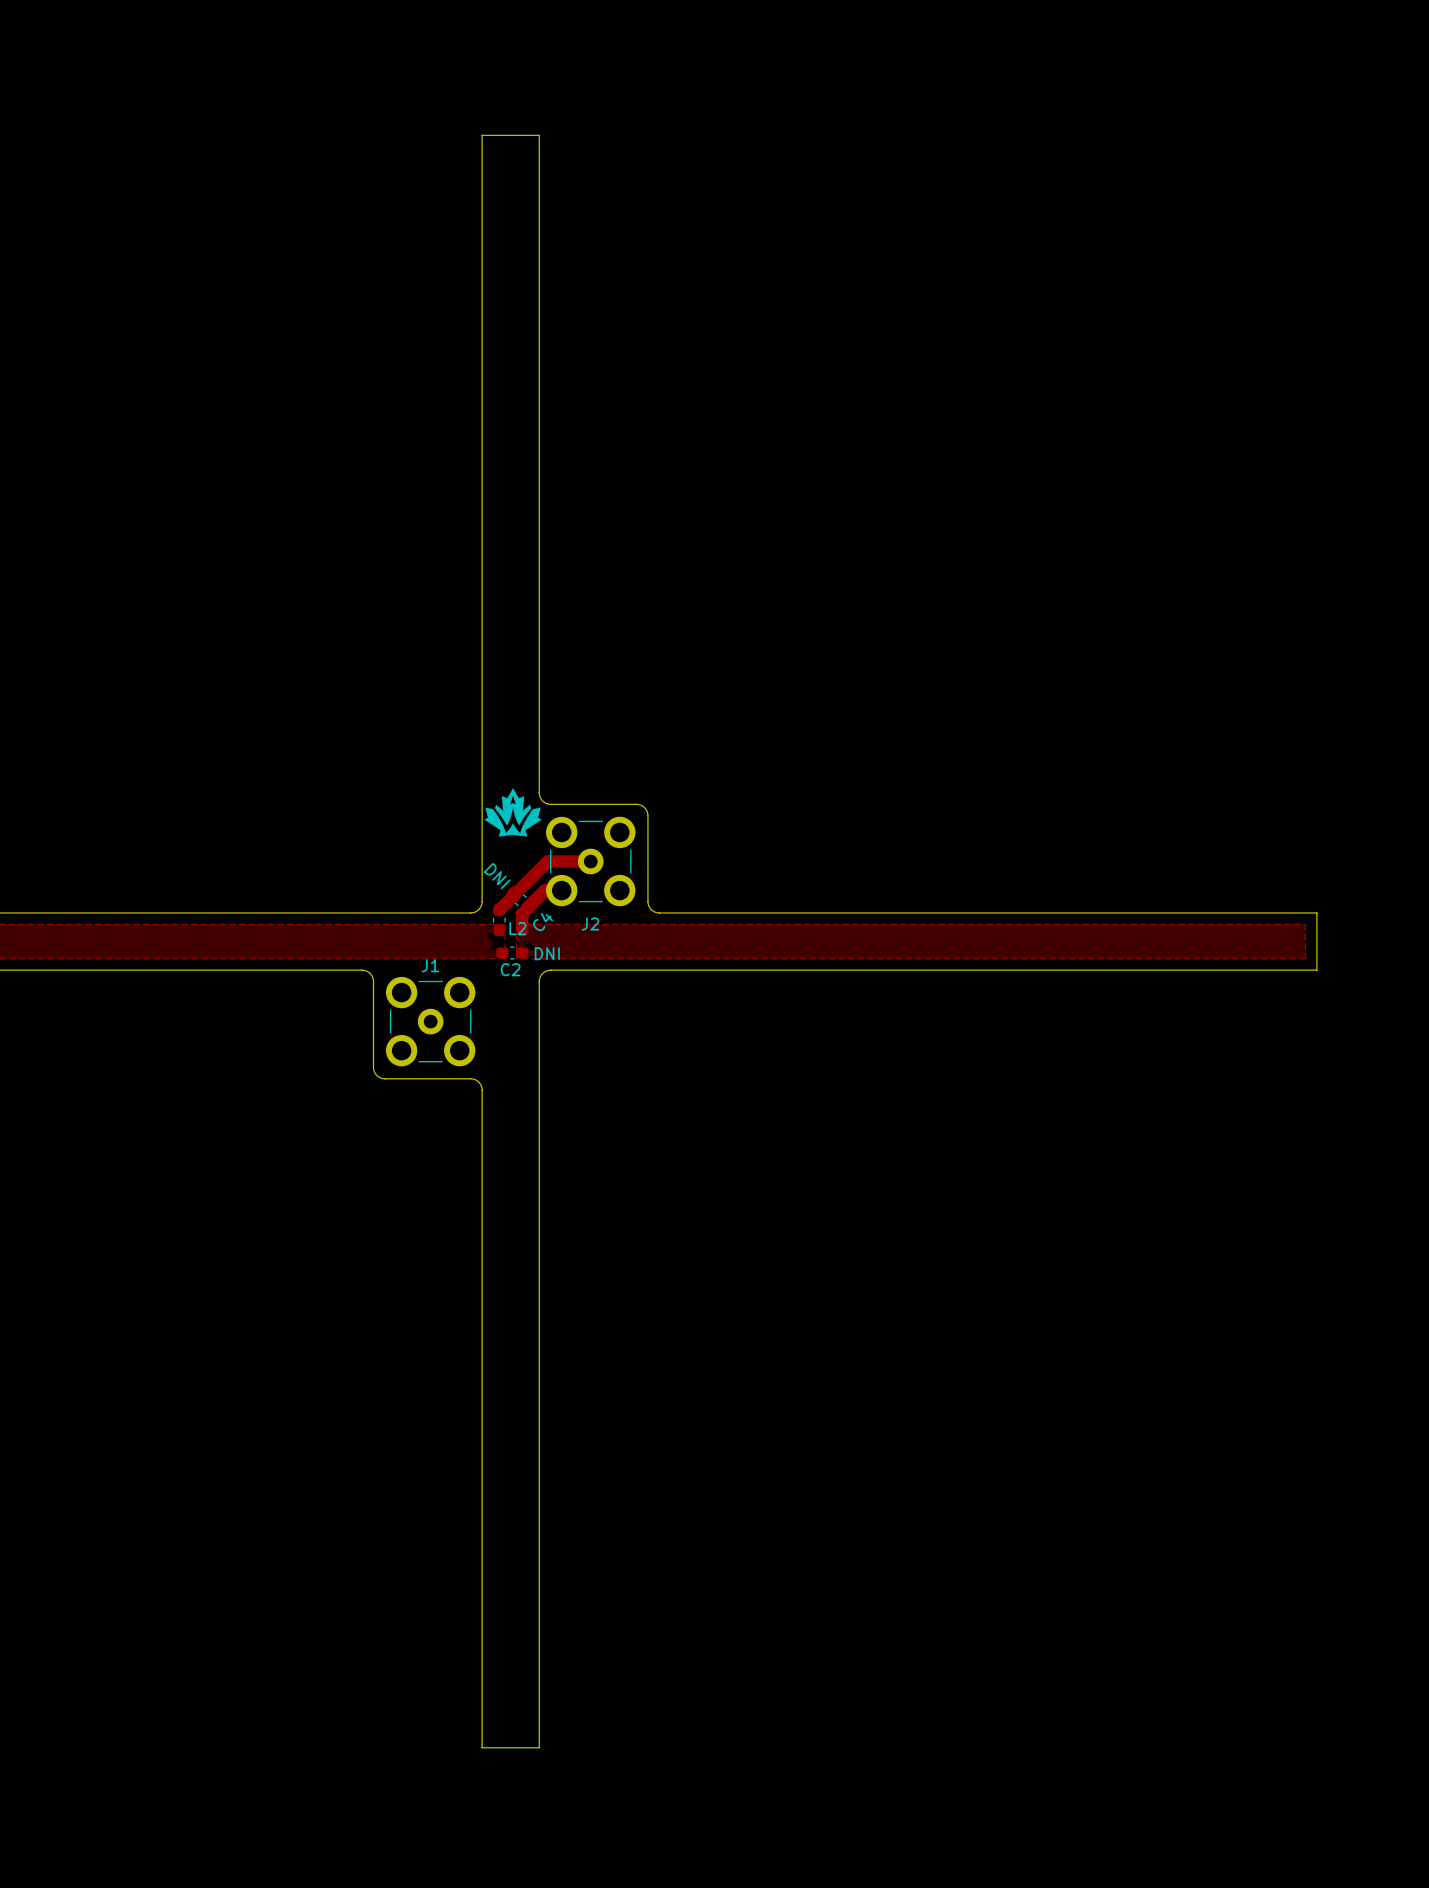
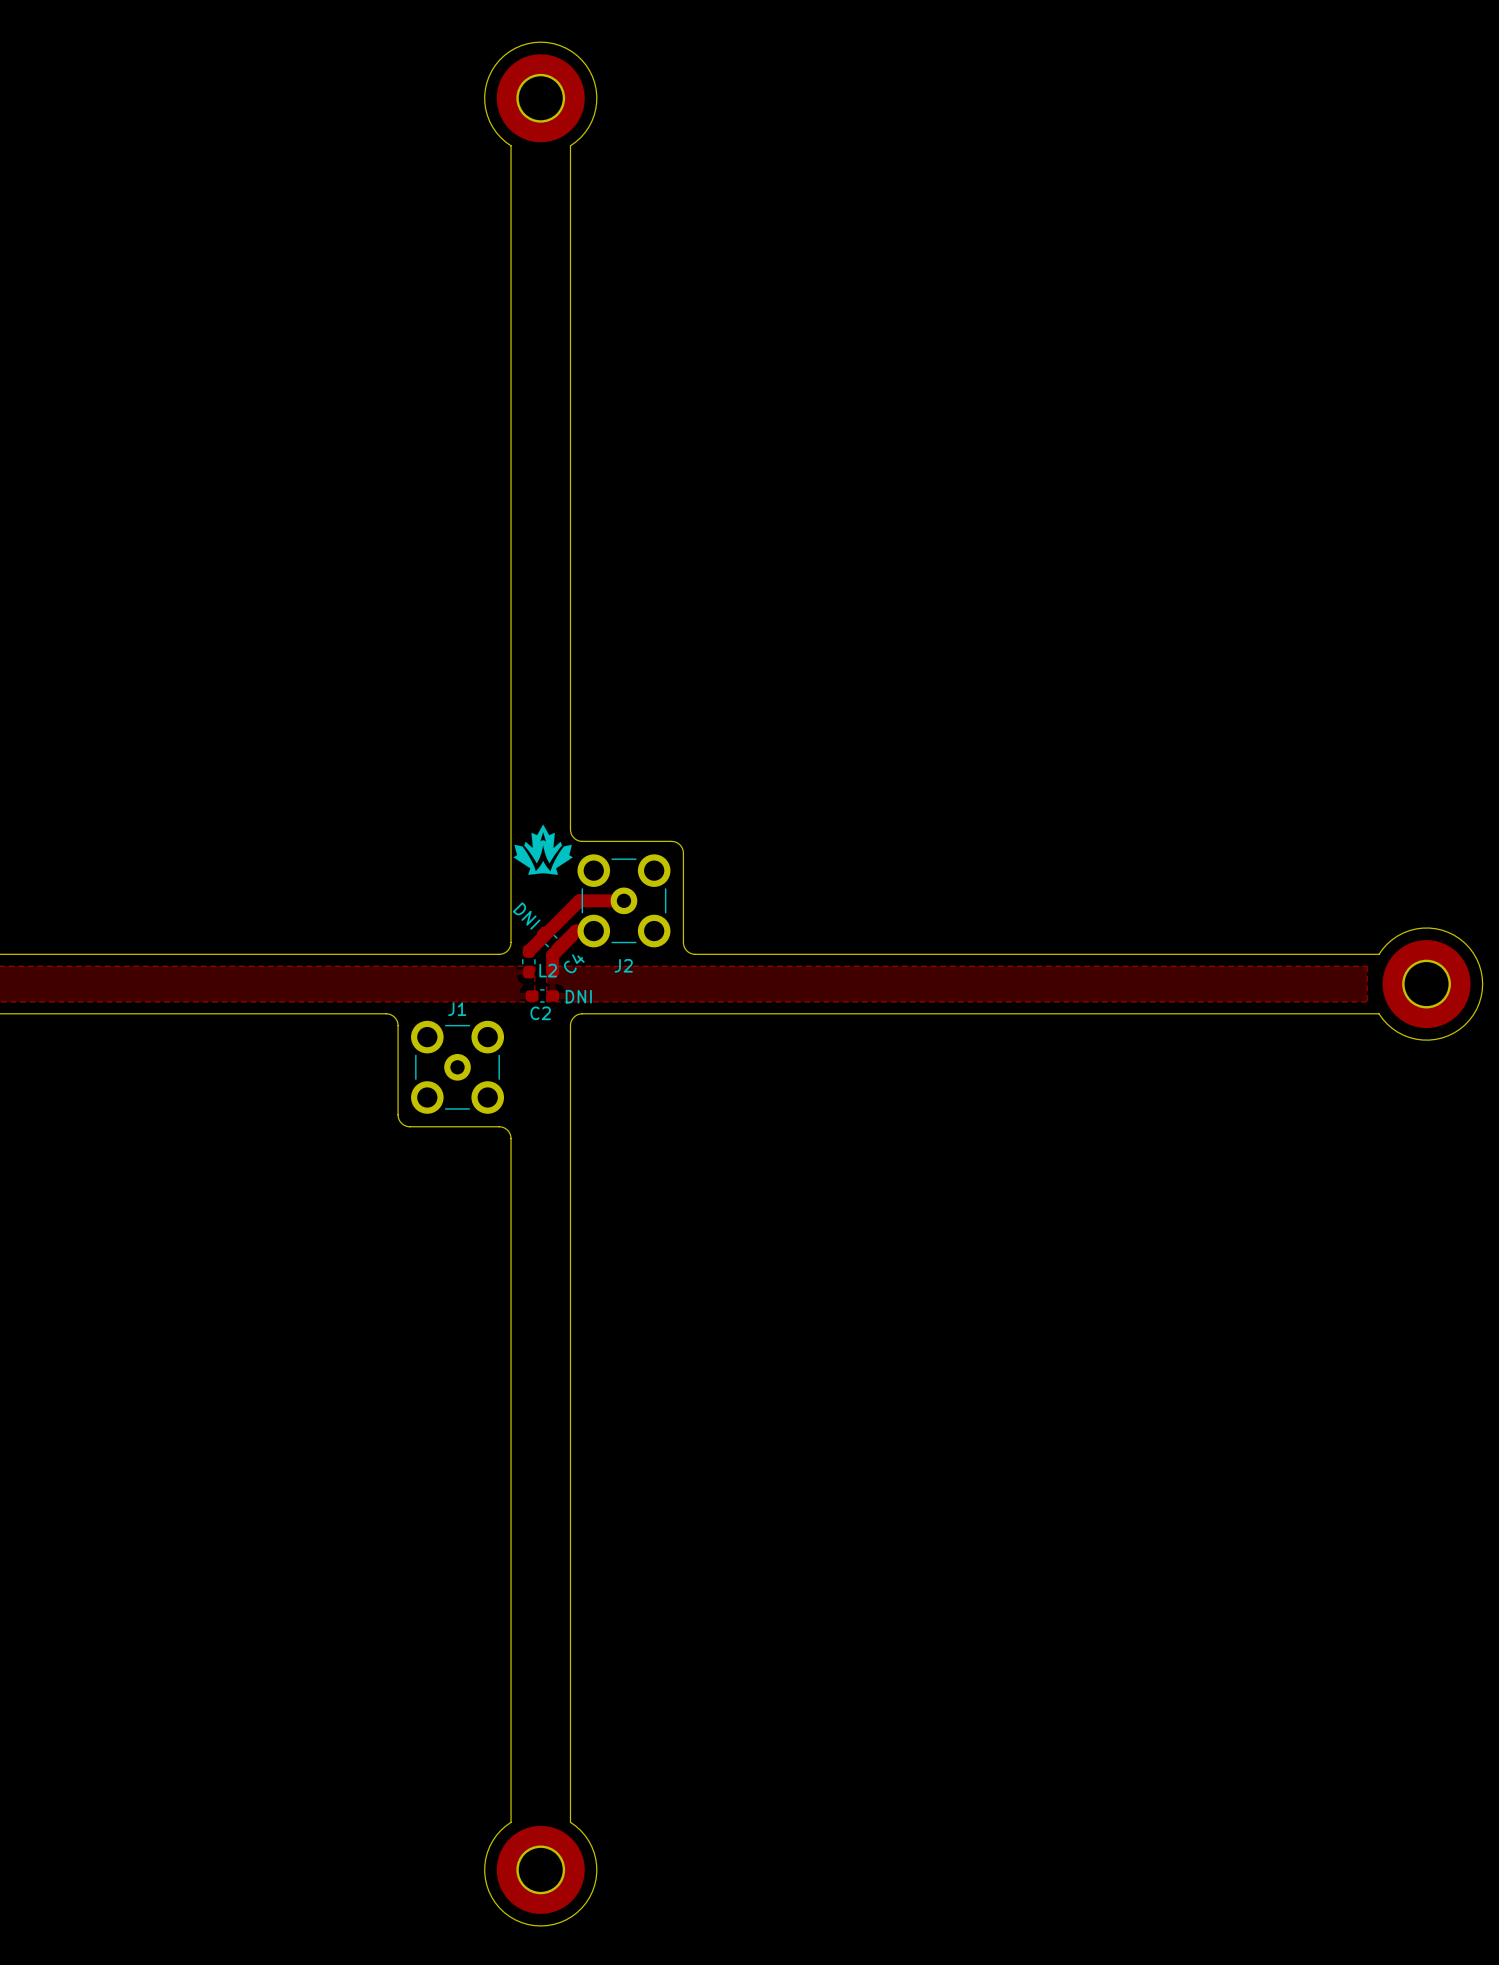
part: none -> (540, 98)
board edge: (482, 135) (539, 135) -> (511, 145) (496, 132) (487, 115) (484, 95) (486, 82) (495, 65) (509, 51) (521, 45) (540, 42) (560, 45) (577, 55) (586, 65) (594, 82) (596, 102) (591, 121) (580, 137) (570, 145)
board edge: (1316, 912) (1316, 970) -> (1379, 954) (1392, 939) (1409, 930) (1429, 928) (1442, 930) (1459, 938) (1473, 953) (1479, 964) (1482, 984) (1479, 1003) (1473, 1015) (1459, 1029) (1442, 1037) (1429, 1040) (1409, 1037) (1392, 1028) (1379, 1013)
part: none -> (1426, 984)
board edge: (482, 1747) (539, 1747) -> (511, 1822) (496, 1835) (487, 1852) (484, 1865) (486, 1885) (495, 1903) (509, 1916) (521, 1922) (540, 1925) (553, 1924) (571, 1916) (586, 1903) (594, 1885) (596, 1872) (594, 1852) (585, 1835) (570, 1822)
part: none -> (540, 1869)

